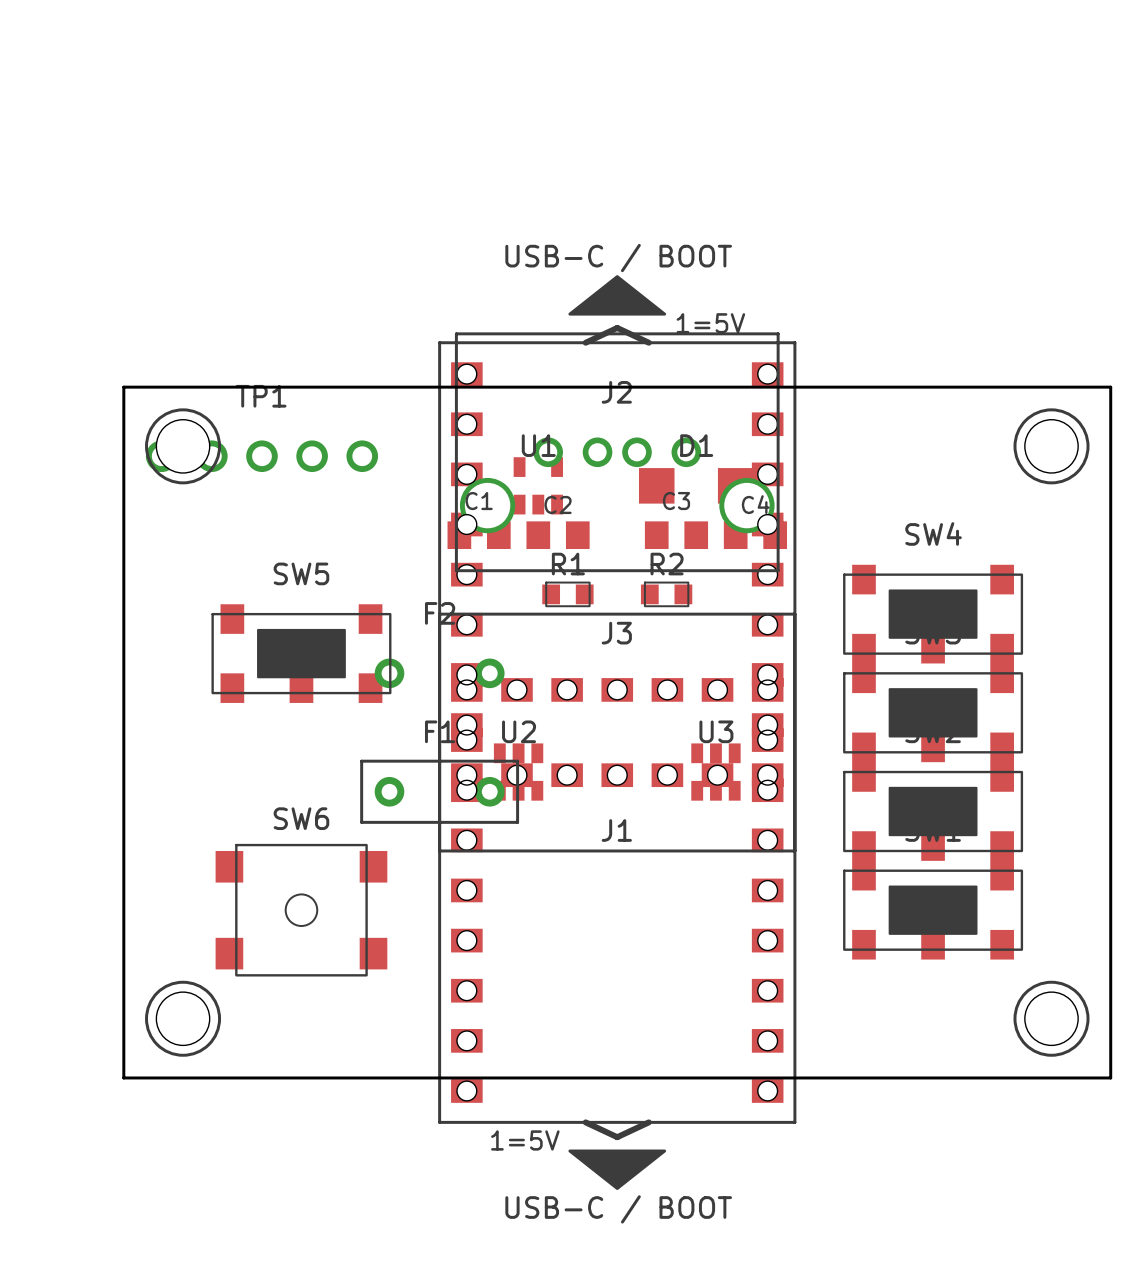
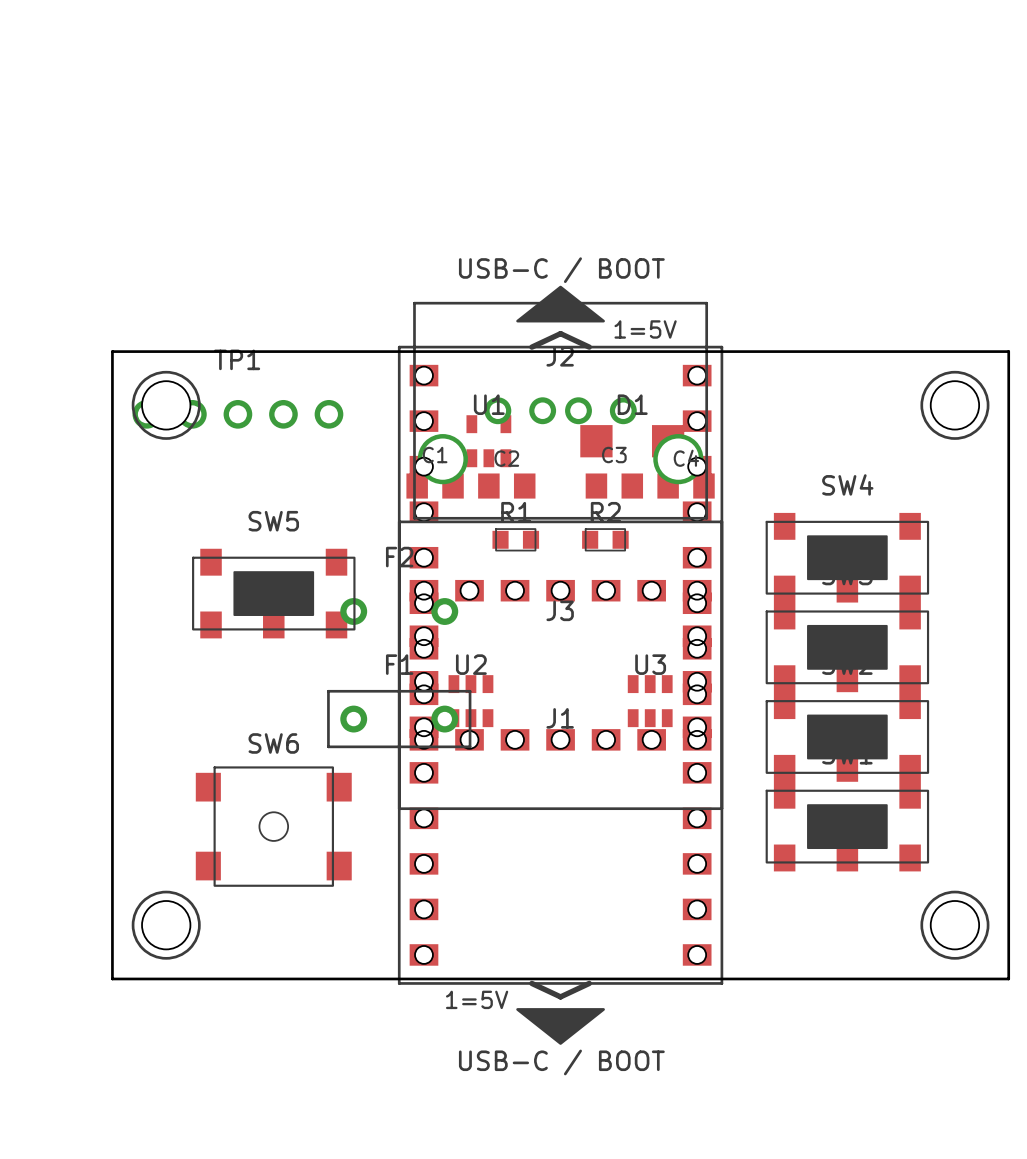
J3 position: (617, 563) -> (560, 547)
J1 position: (617, 901) -> (560, 782)

